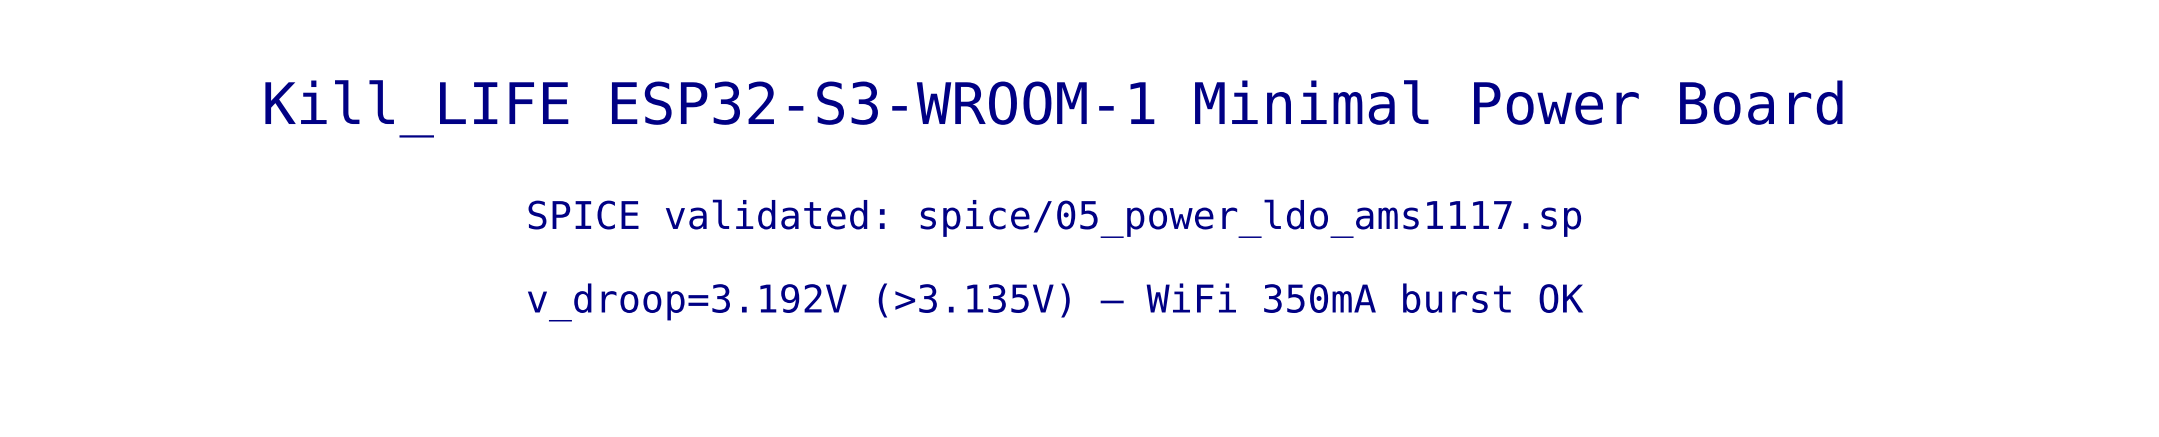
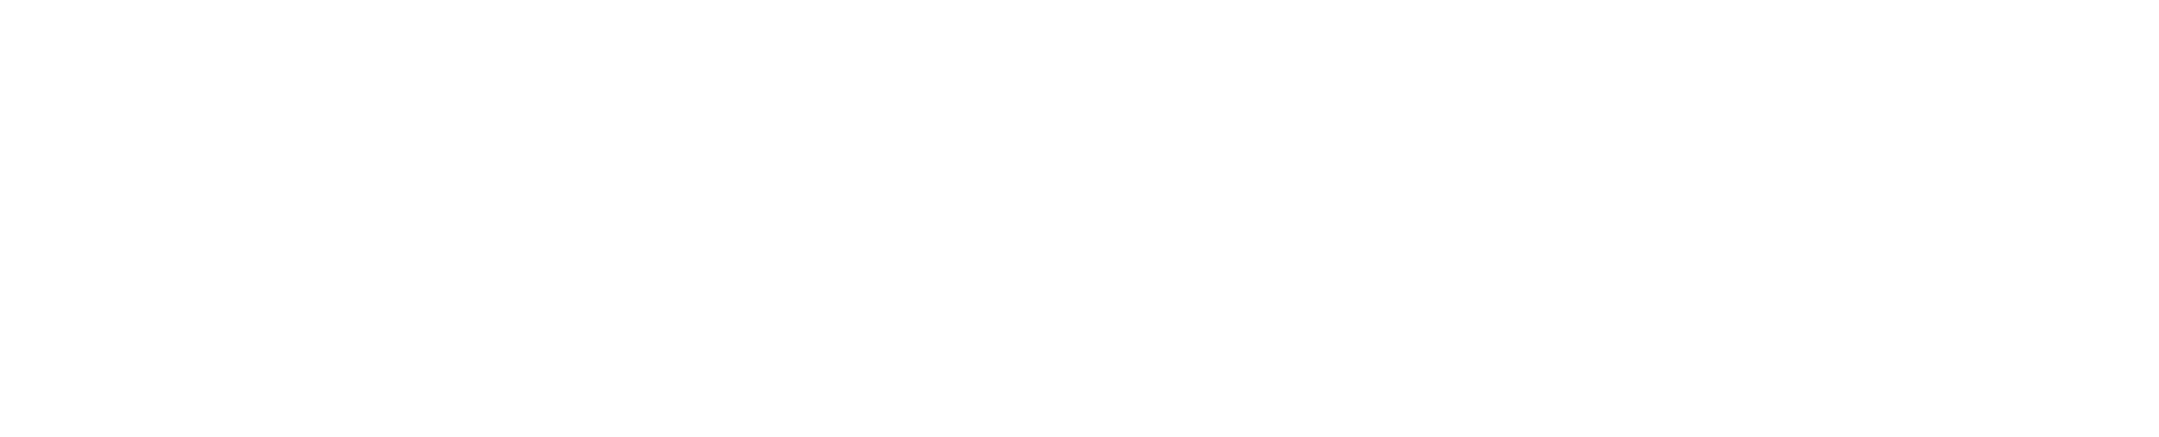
text: Kill_LIFE ESP32-S3-WROOM-1 Minimal Power Board (1053, 108) -> none
text: SPICE validated: spice/05_power_ldo_ams1117.sp (1054, 218) -> none
text: v_droop=3.192V (>3.135V) — WiFi 350mA burst OK (1055, 302) -> none

